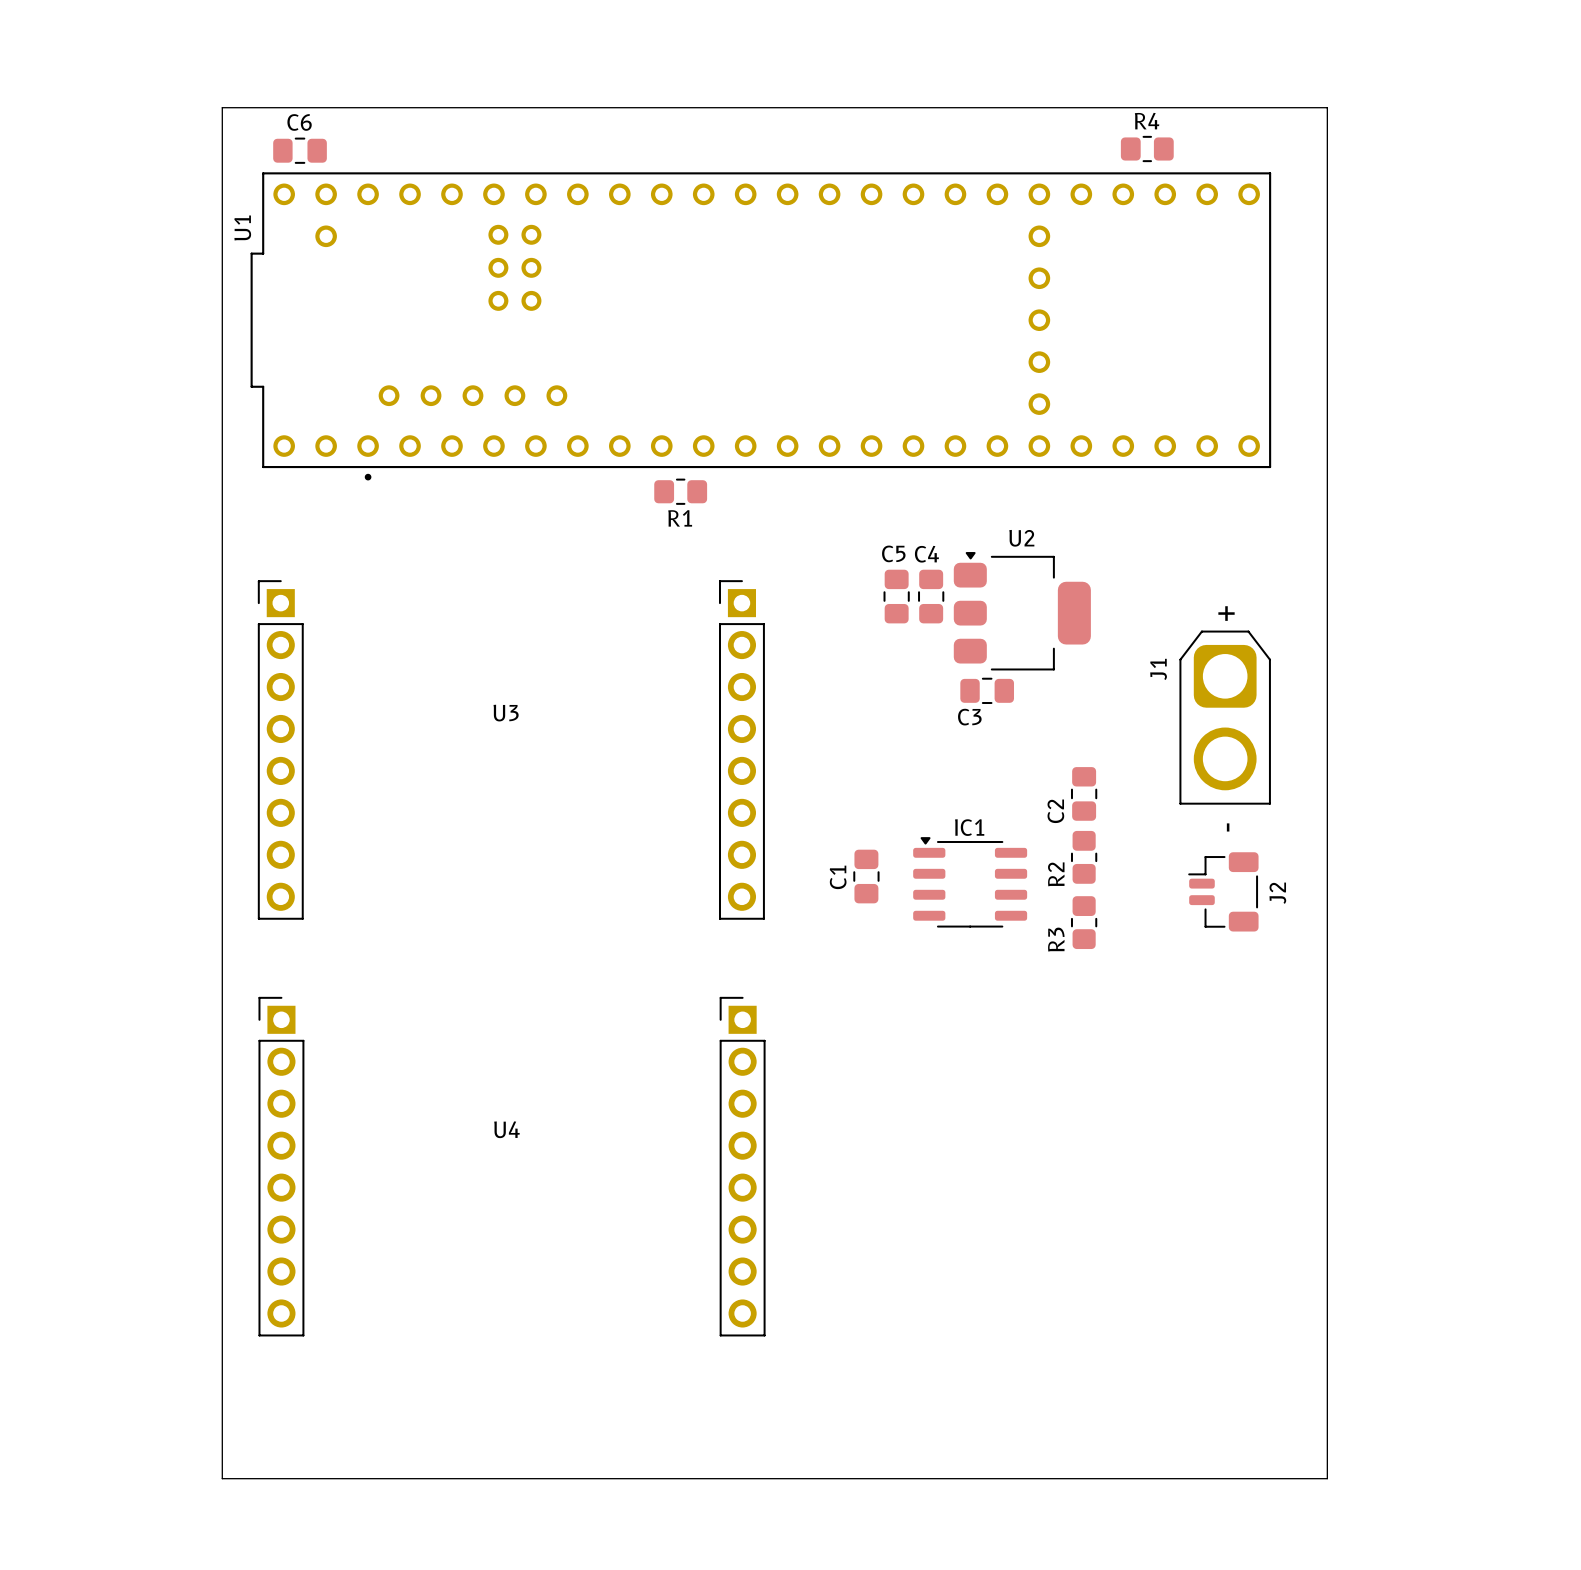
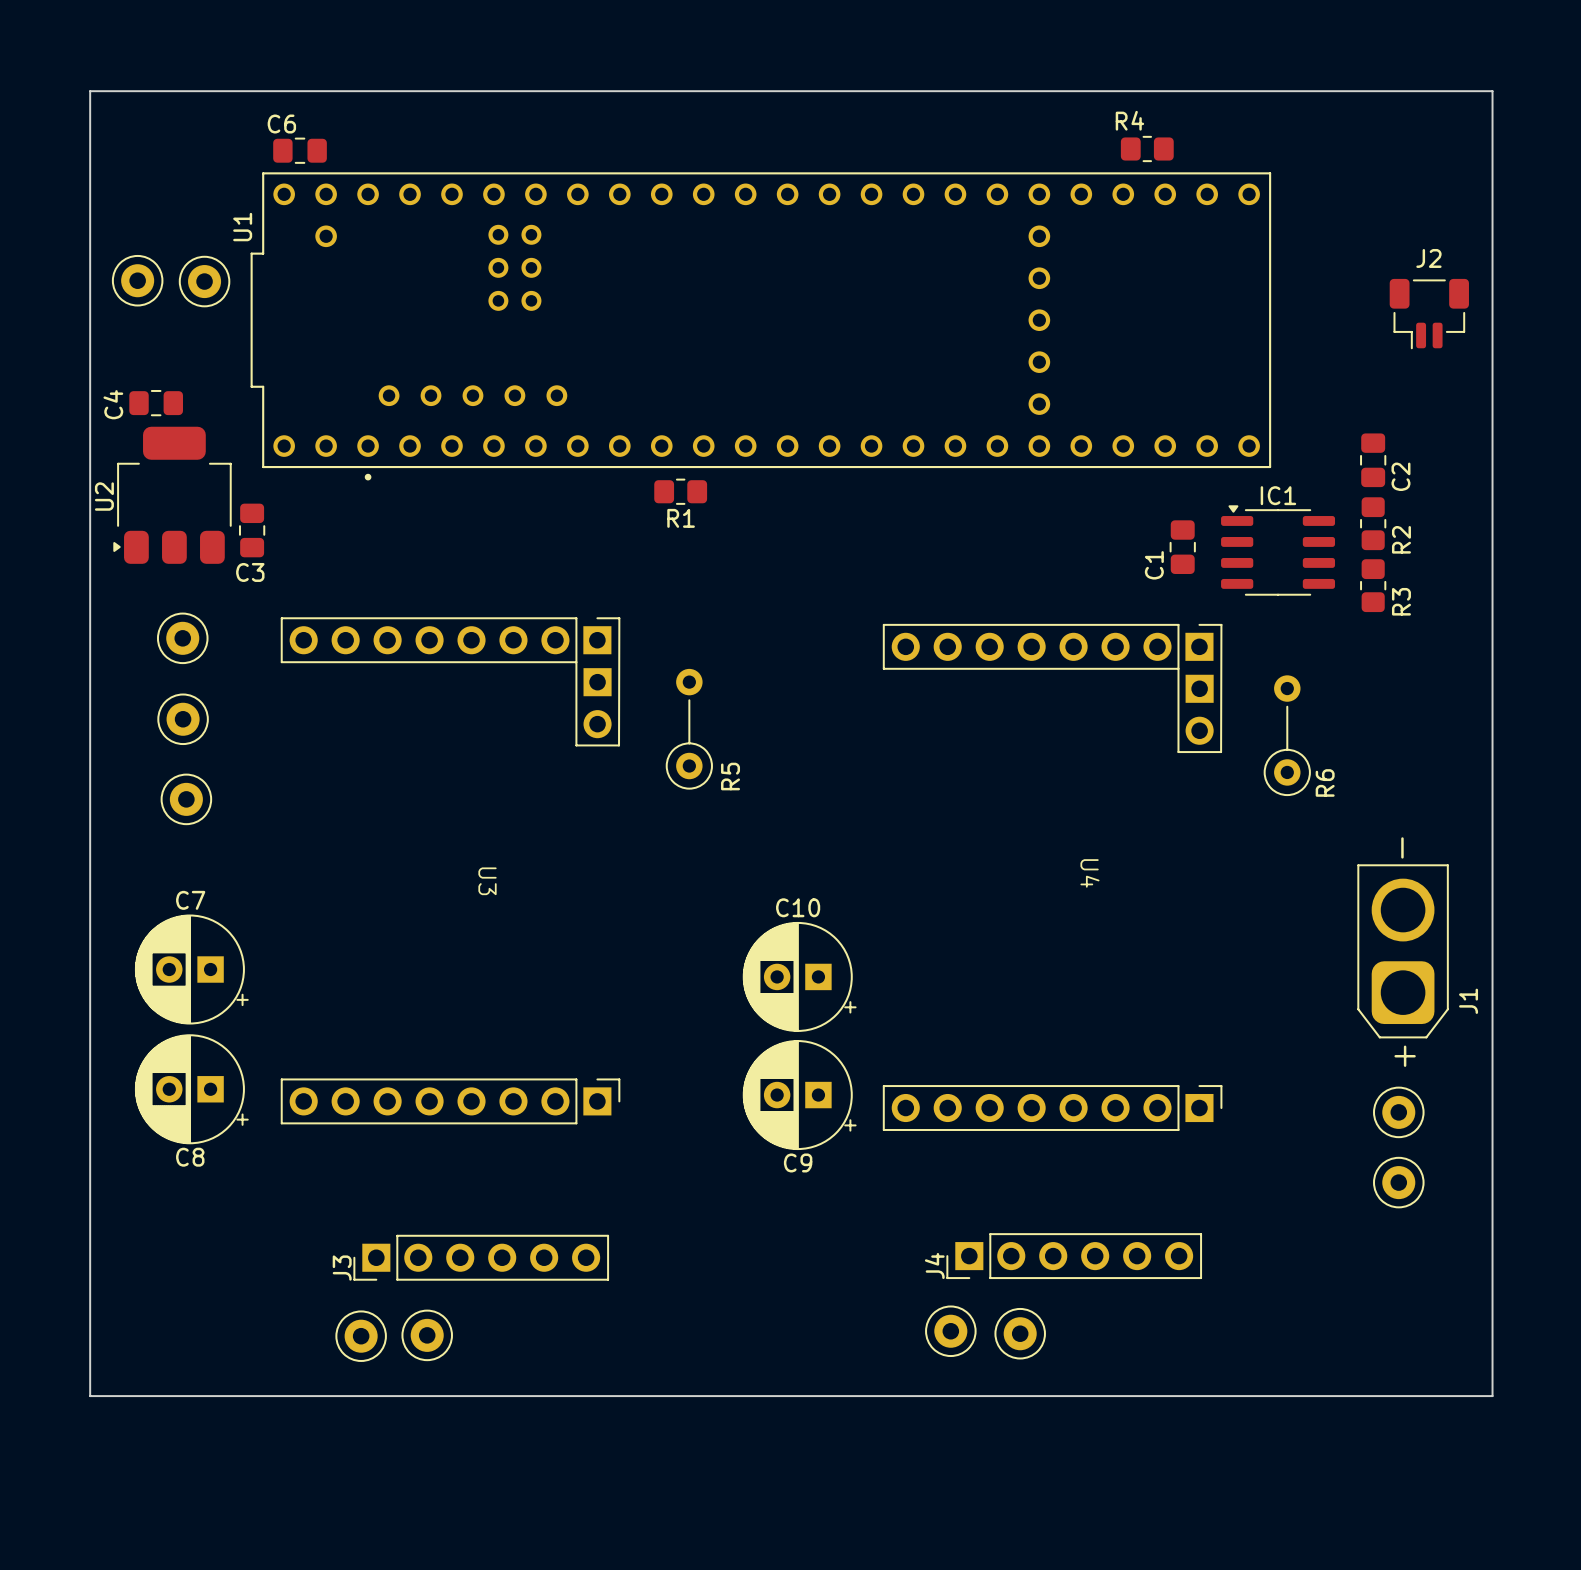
board edge: (222, 107) (1327, 107) (1327, 1478) (222, 1478) (222, 107) -> (90, 91) (90, 1396) (1492, 1396) (1492, 91) (90, 91)
R4 name position: R4 (1147, 121) -> R4 (1129, 120)
C6 name position: C6 (299, 122) -> C6 (281, 124)
part: none -> (137, 280)
part: none -> (204, 281)
C4 name position: C4 (926, 554) -> C4 (113, 404)
U3 footprint: [257, 580, 765, 920] -> [280, 617, 621, 1125]
C5: (896, 596) -> none
C4 rotation: 0° (931, 596) -> 90° clockwise (156, 403)
C4 position: (931, 596) -> (156, 403)
U2 rotation: 0° (1022, 611) -> 90° counterclockwise (172, 495)
U2 position: (1022, 611) -> (172, 495)
J1 footprint: [1179, 630, 1271, 805] -> [1357, 864, 1449, 1039]
part: none -> (182, 638)
J1 name position: J1 (1158, 669) -> J1 (1468, 1001)
C3 rotation: 0° (987, 690) -> 90° clockwise (252, 530)
C3 position: (987, 690) -> (252, 530)
U3 name position: U3 (506, 713) -> U3 (487, 881)
part: none -> (183, 719)
R5: none -> (689, 729)
R6: none -> (1287, 735)
C2 position: (1084, 793) -> (1373, 460)
part: none -> (186, 799)
C2 name position: C2 (1055, 811) -> C2 (1400, 476)
R2 position: (1084, 857) -> (1373, 523)
R2 name position: R2 (1056, 874) -> R2 (1401, 539)
C1 position: (866, 876) -> (1182, 547)
C1 name position: C1 (838, 877) -> C1 (1154, 565)
IC1 position: (970, 882) -> (1278, 550)
J2 rotation: 0° (1223, 891) -> 90° counterclockwise (1429, 314)
J2 position: (1223, 891) -> (1429, 314)
R3 position: (1084, 922) -> (1373, 585)
R3 name position: R3 (1056, 939) -> R3 (1401, 601)
C7: none -> (191, 969)
C10: none -> (799, 976)
U4 footprint: [258, 996, 766, 1337] -> [882, 623, 1223, 1131]
C8: none -> (191, 1089)
C9: none -> (799, 1095)
part: none -> (1398, 1112)
U4 name position: U4 (506, 1129) -> U4 (1089, 873)
part: none -> (1398, 1182)
J4: none -> (1074, 1256)
J3: none -> (481, 1257)
part: none -> (950, 1331)
part: none -> (1020, 1333)
part: none -> (427, 1335)
part: none -> (361, 1336)

